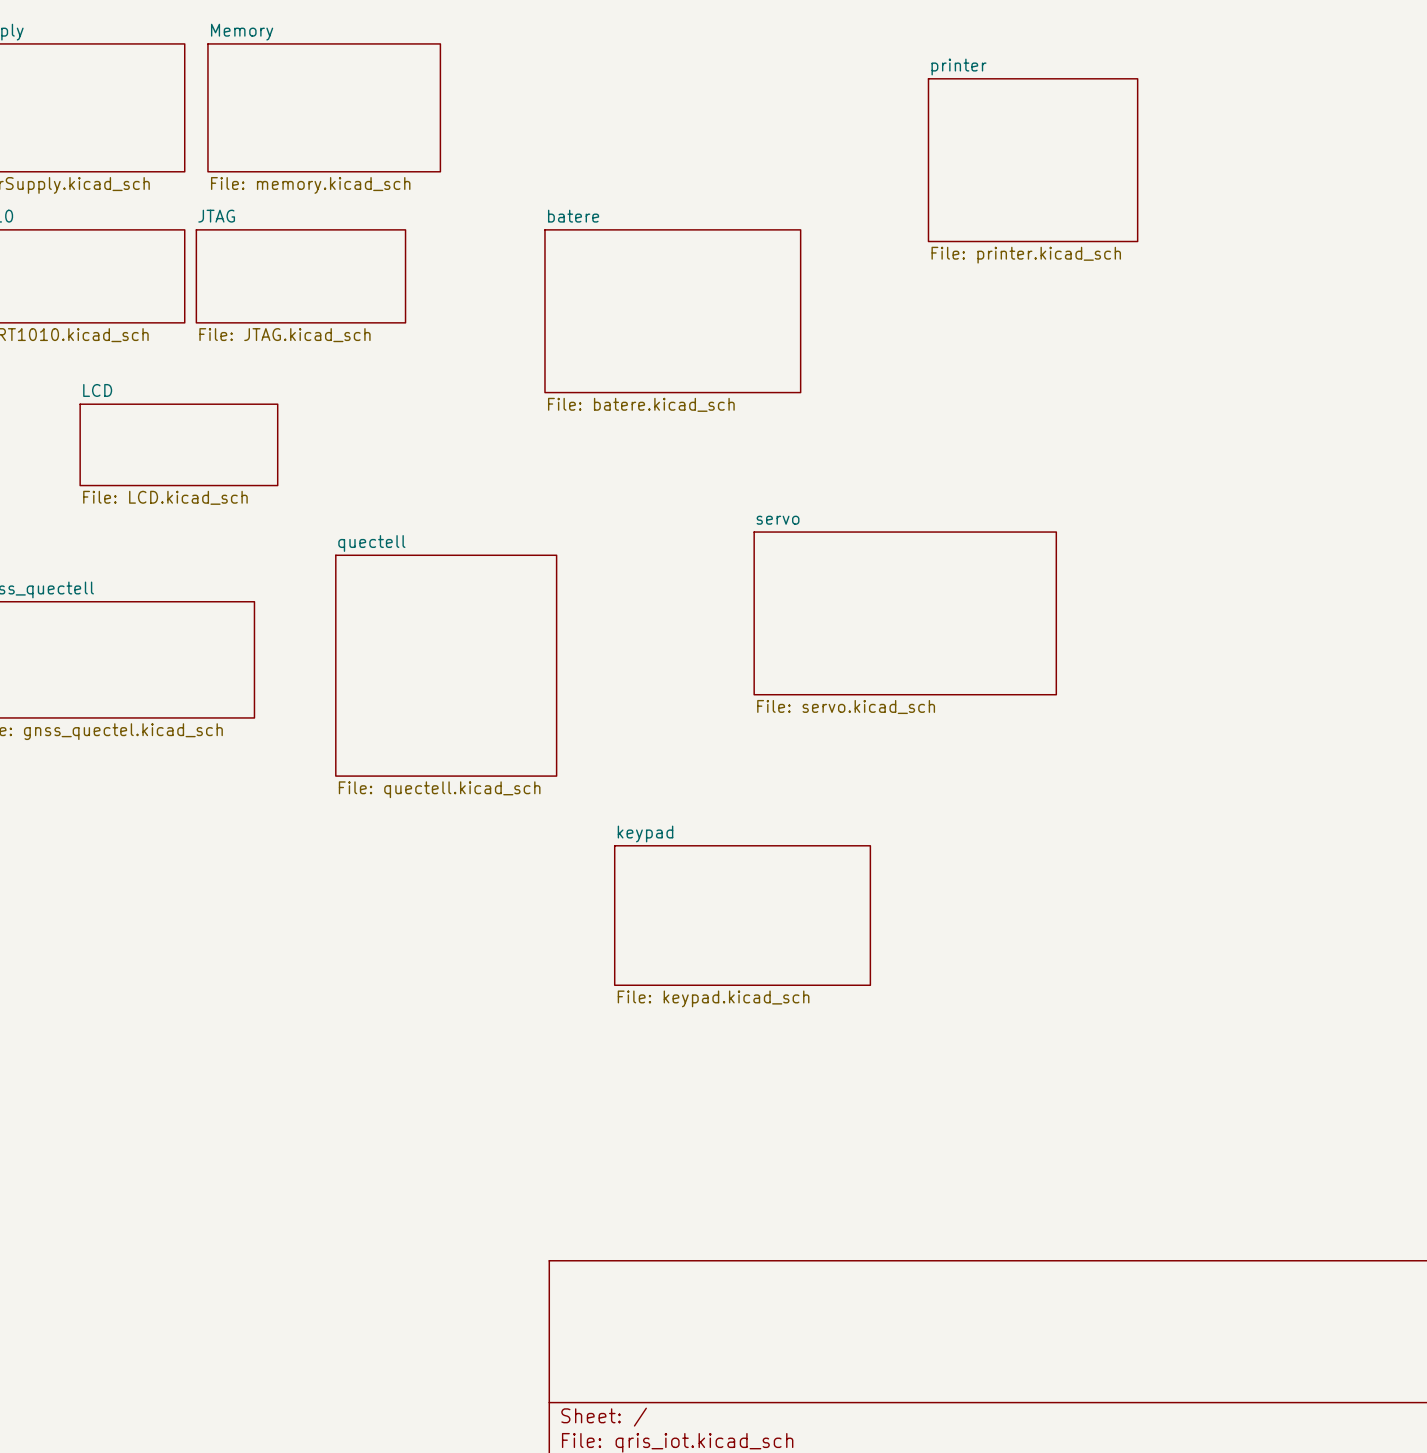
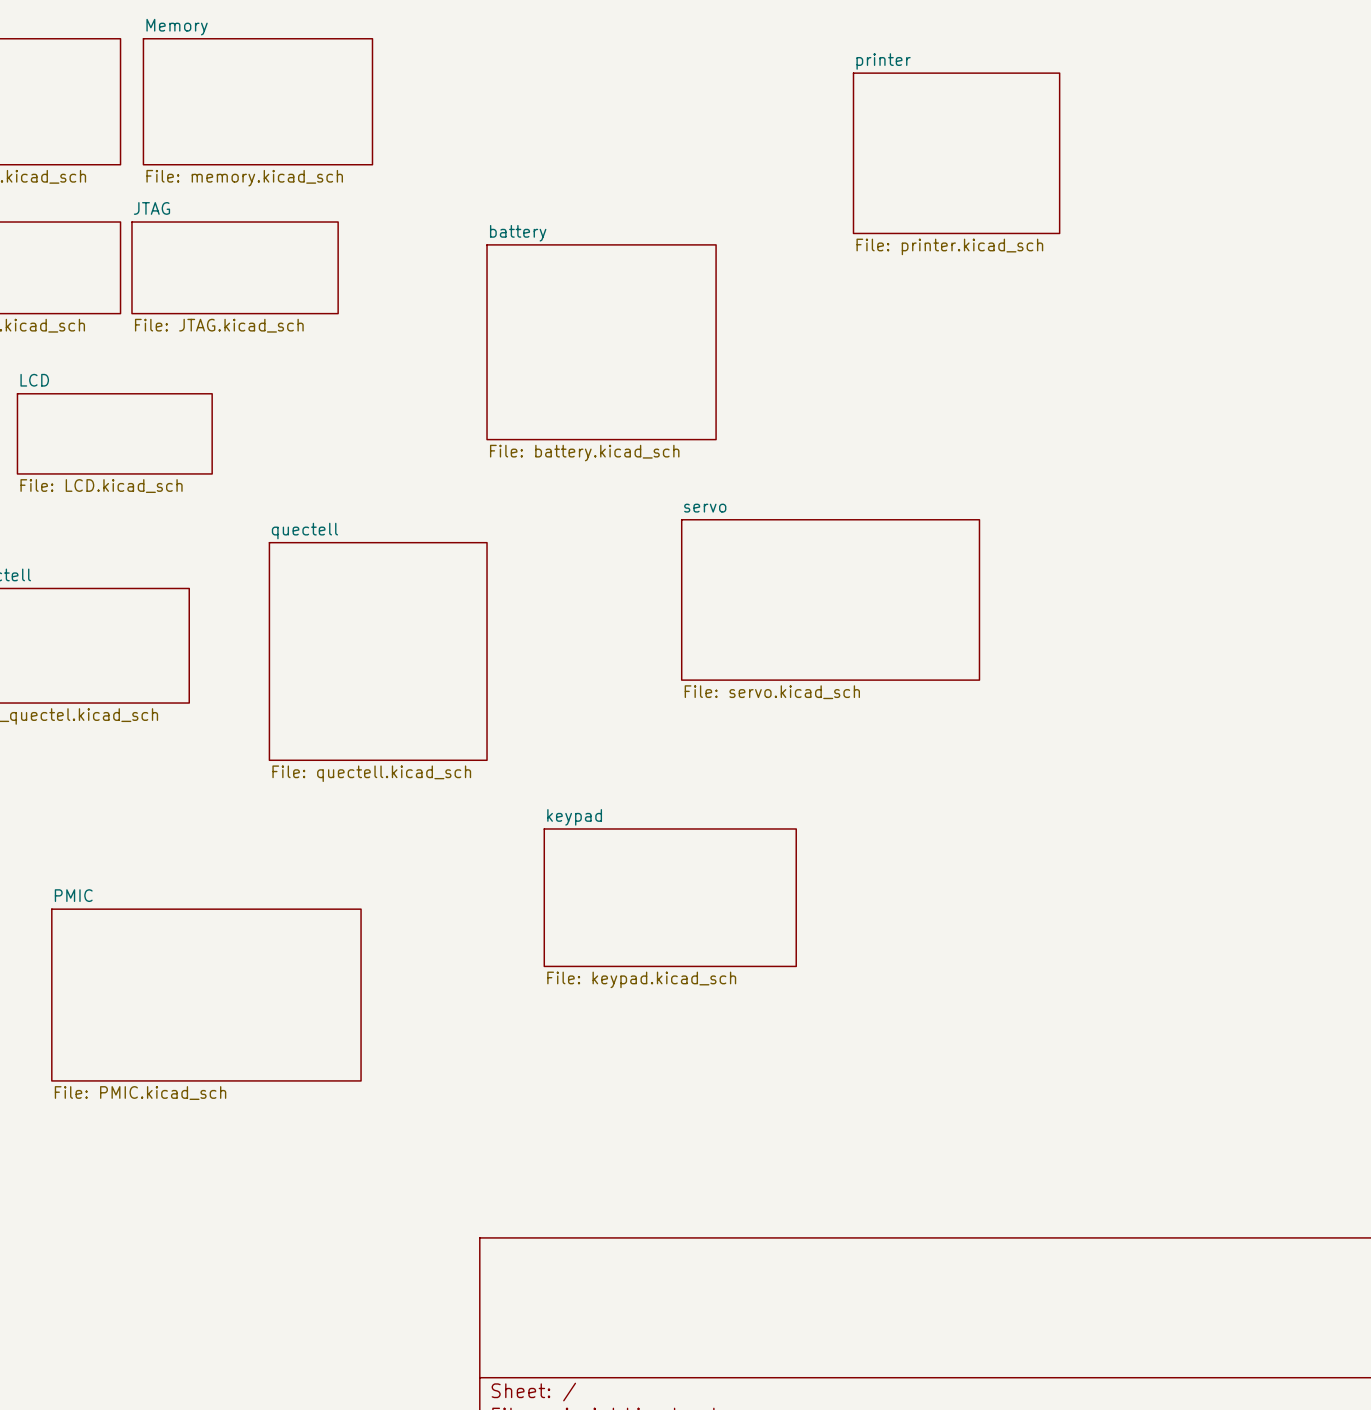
sheet batere: File: batere.kicad_sch (672, 311) -> none
sheet battery: none -> File: battery.kicad_sch (601, 342)
sheet PMIC: none -> File: PMIC.kicad_sch (206, 995)

